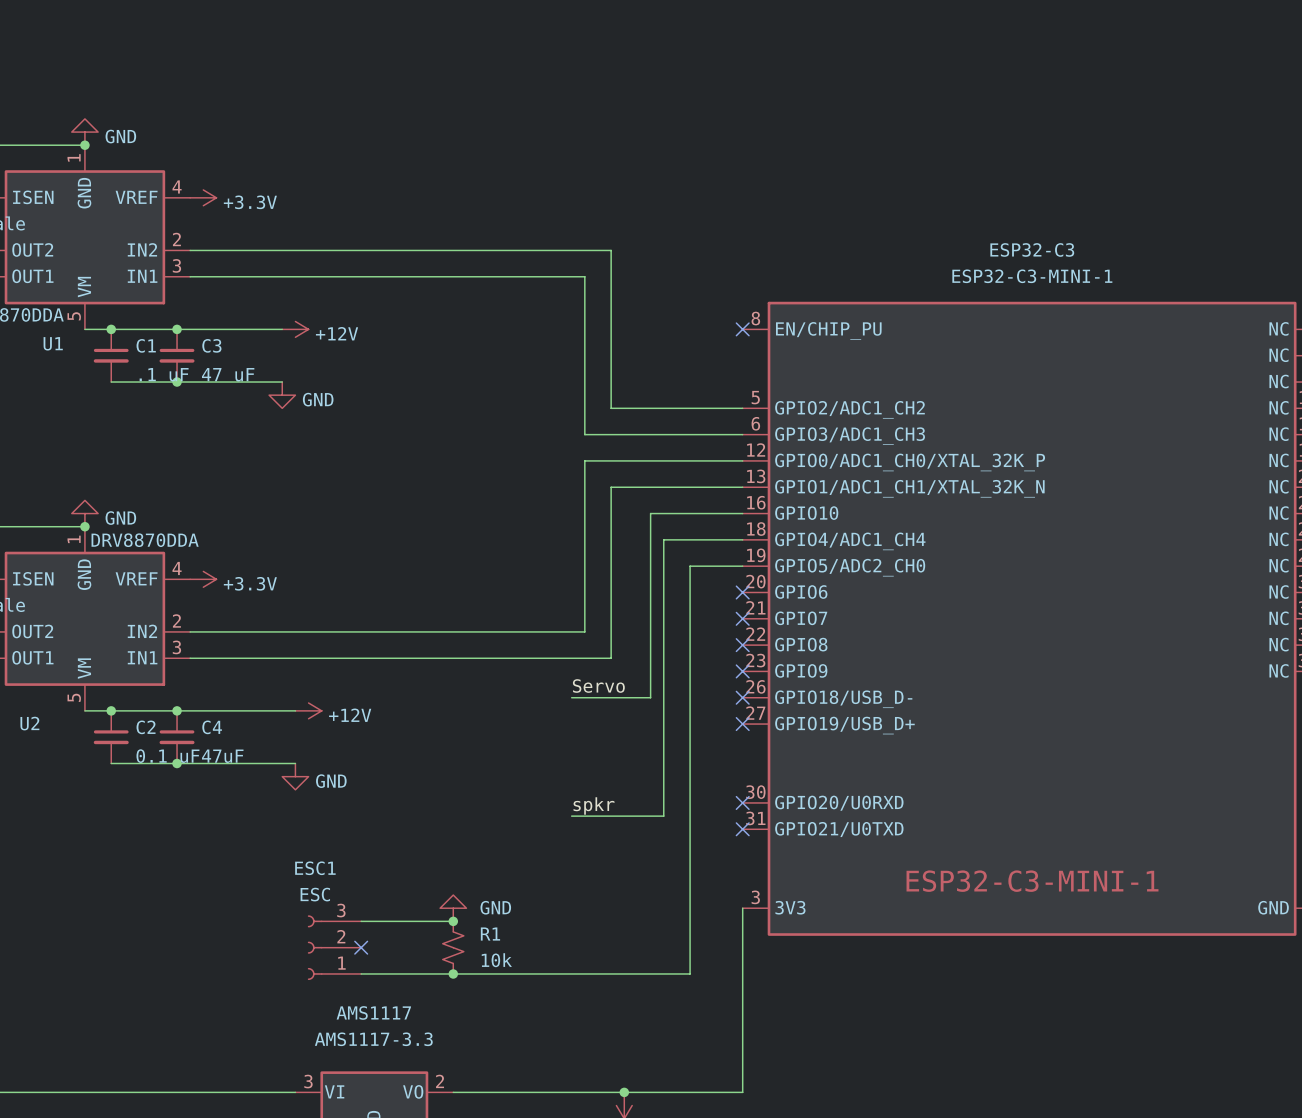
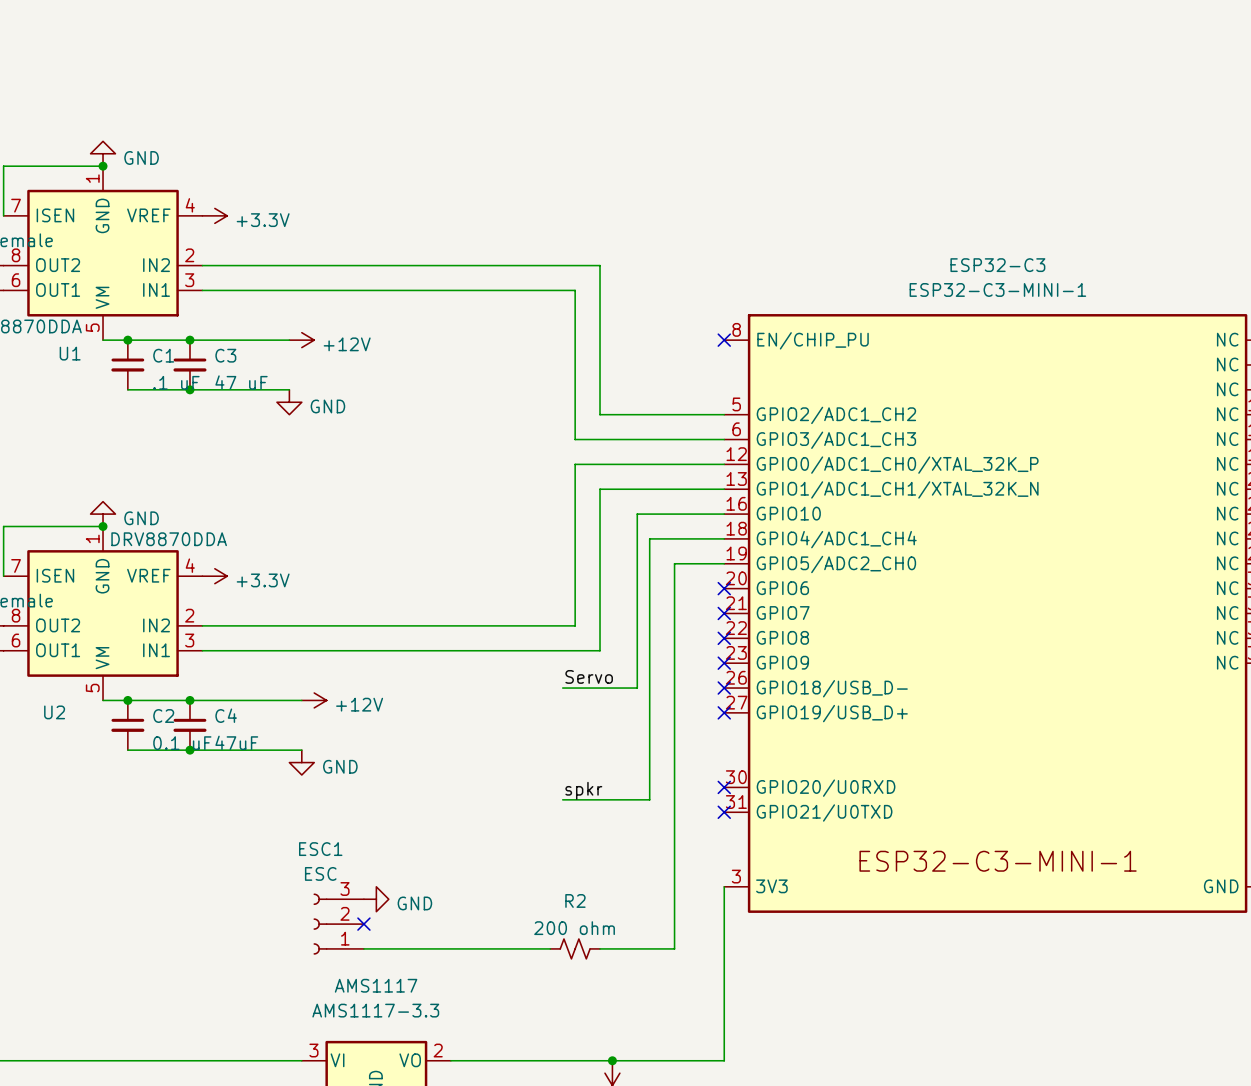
power symbol rotation: 0° (453, 908) -> 90° clockwise (376, 899)
power symbol position: GND (453, 908) -> GND (376, 899)
wire: (361, 921) (453, 921) -> none
junction: (453, 921) -> none
R1: 10k (453, 947) -> none
junction: (453, 973) -> none
R2: none -> 200 ohm (575, 948)

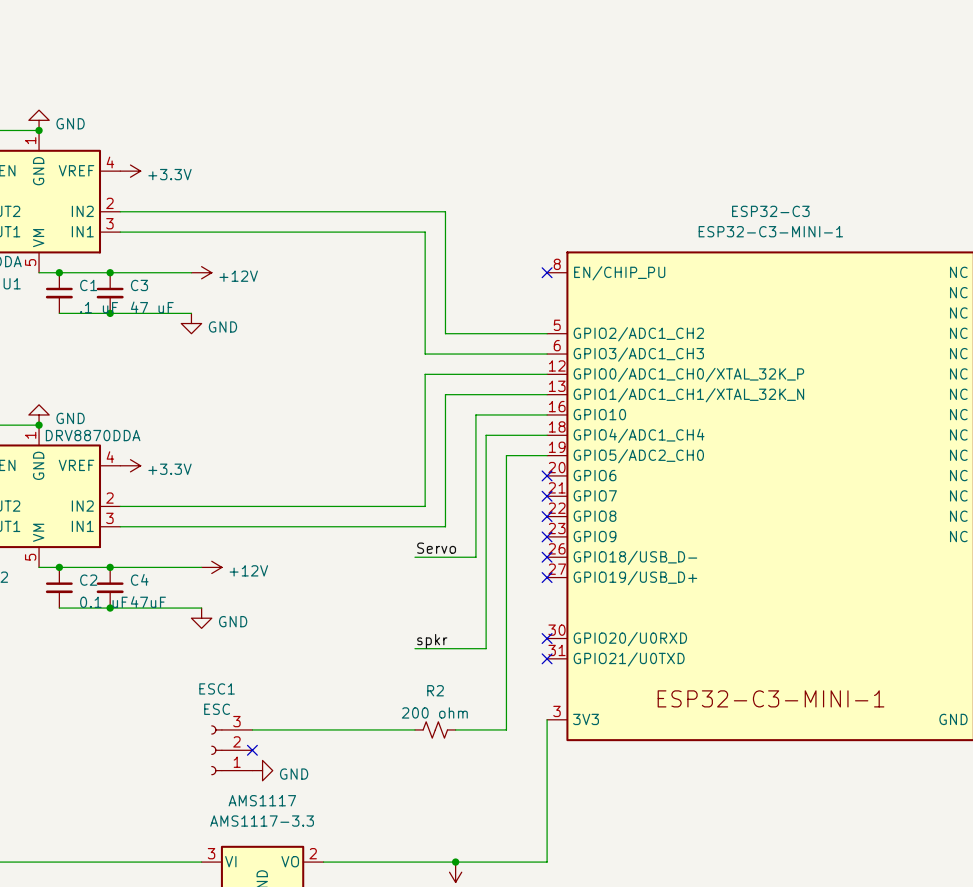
wire: none -> (252, 729) (414, 729)
power symbol position: GND (376, 899) -> GND (262, 770)
wire: (674, 899) (674, 948) (600, 948) -> (506, 729) (455, 729)
wire: (363, 948) (550, 948) -> none
R2 position: (575, 948) -> (435, 729)

